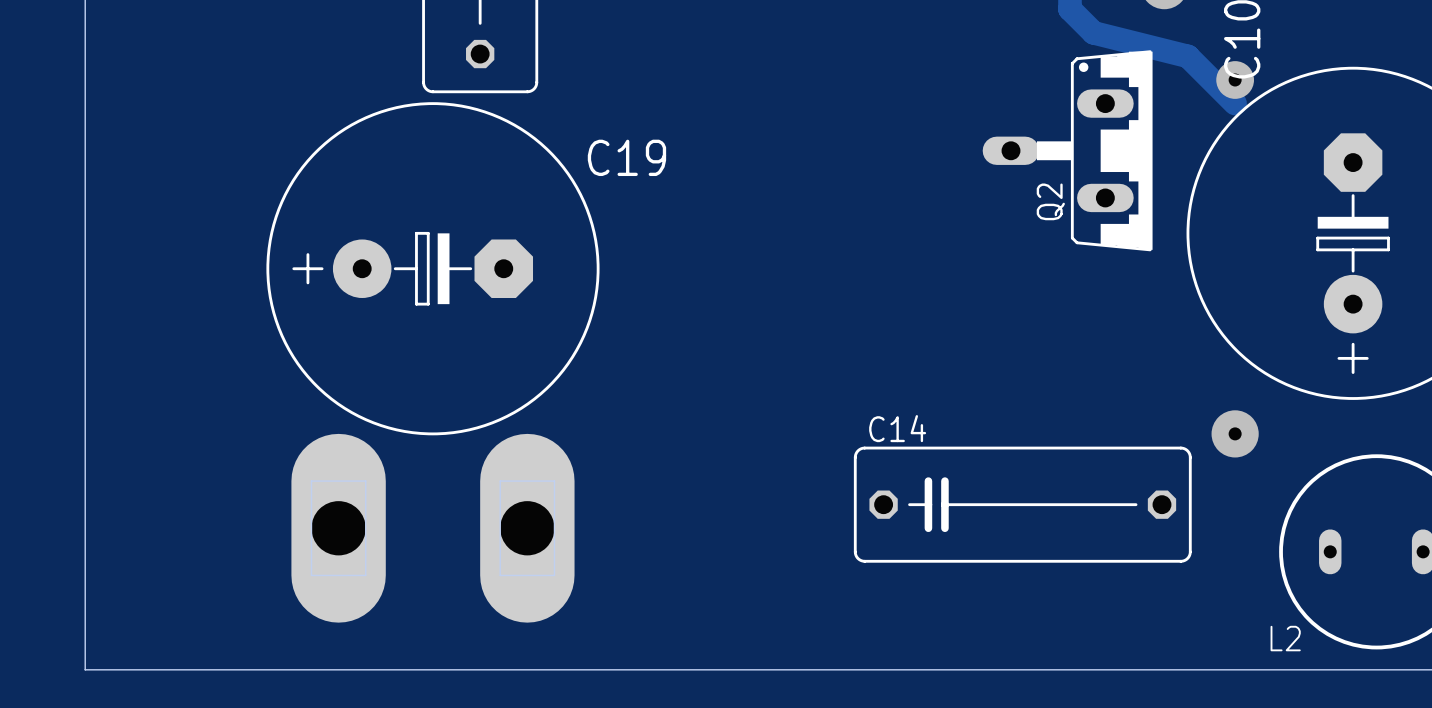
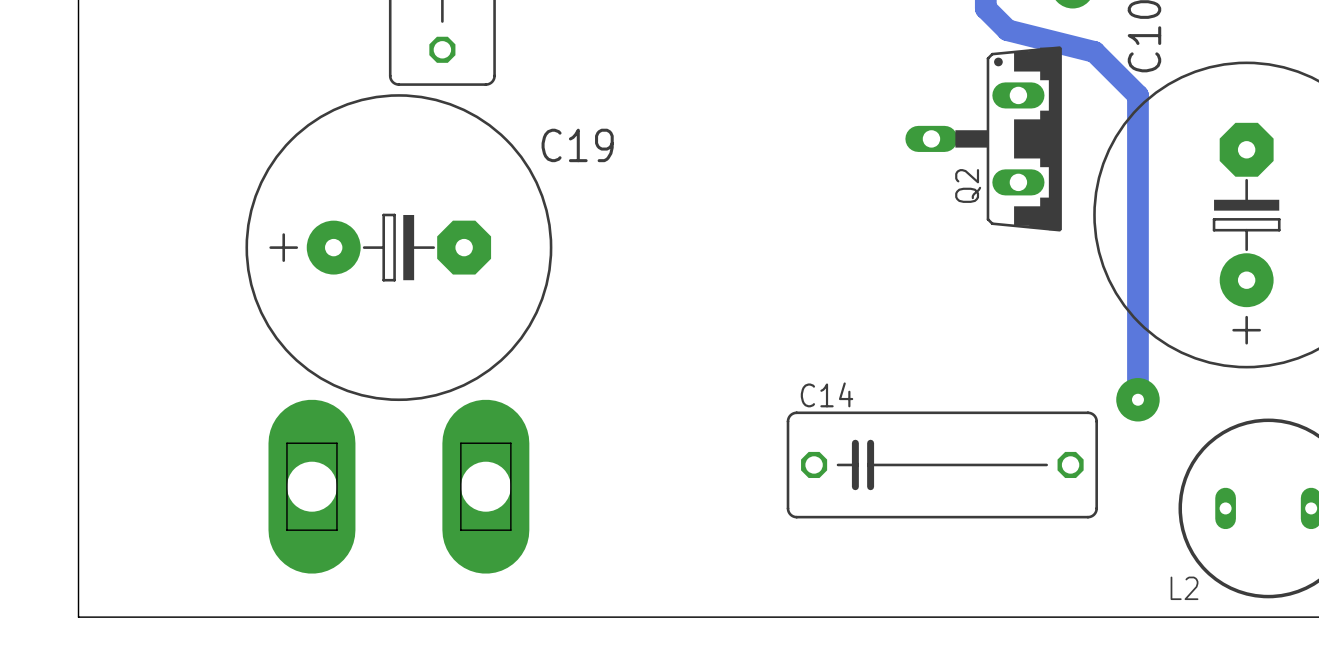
via: (1235, 80) -> none
track: none -> (1137, 95) (1137, 399)

